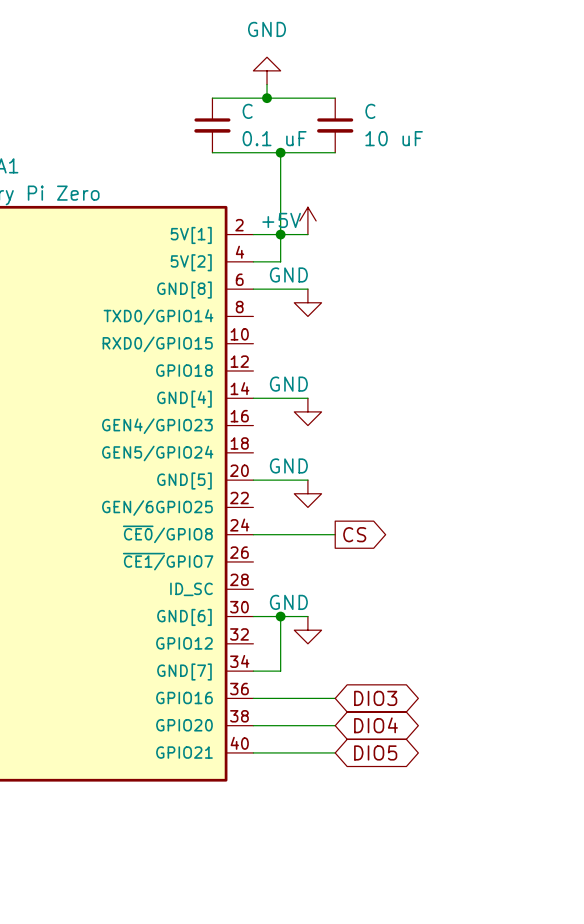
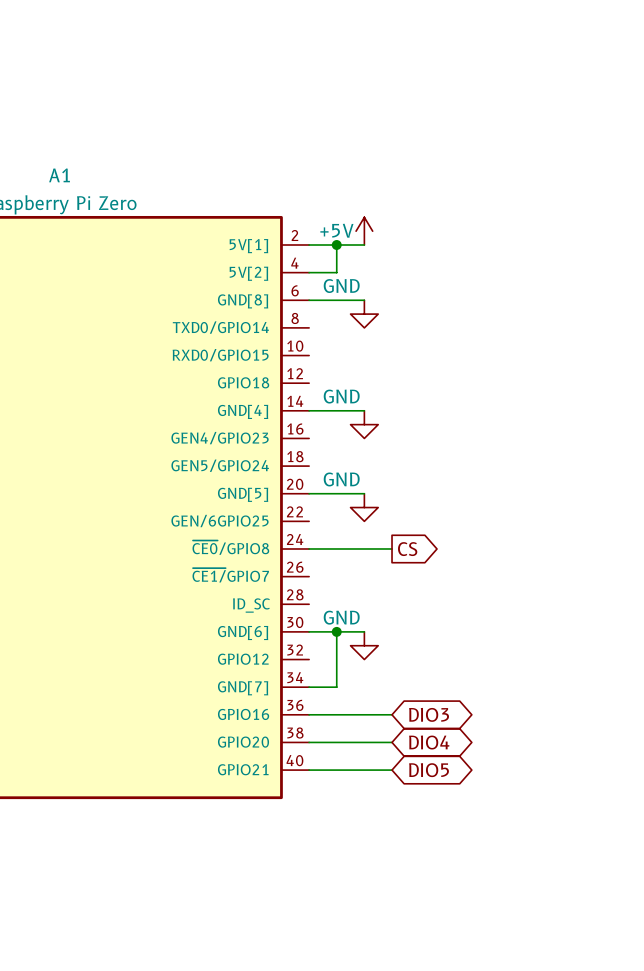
power symbol: GND (267, 70) -> none
wire: (267, 84) (267, 98) -> none
wire: (212, 98) (335, 98) -> none
junction: (267, 98) -> none
C: 0.1 uF (212, 125) -> none
C: 10 uF (335, 125) -> none
wire: (212, 152) (335, 152) -> none
wire: (280, 152) (280, 234) -> none
junction: (280, 152) -> none

